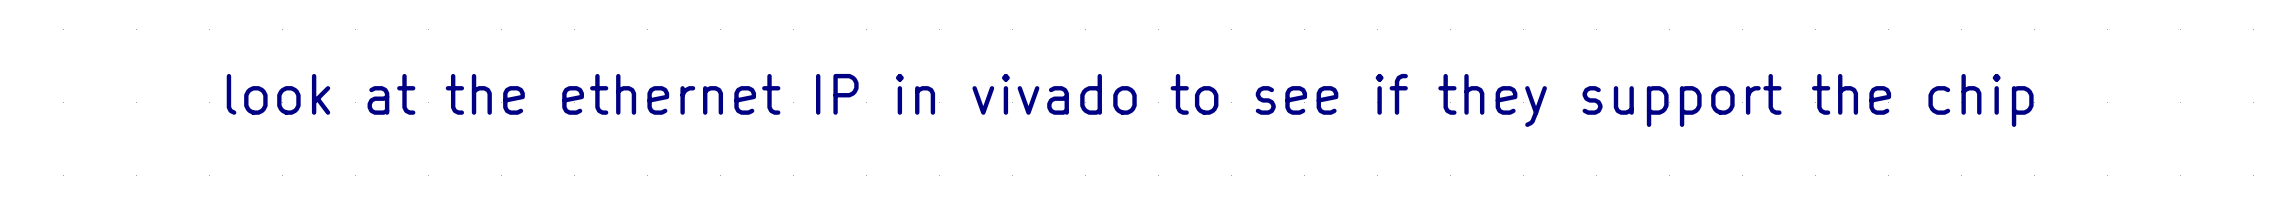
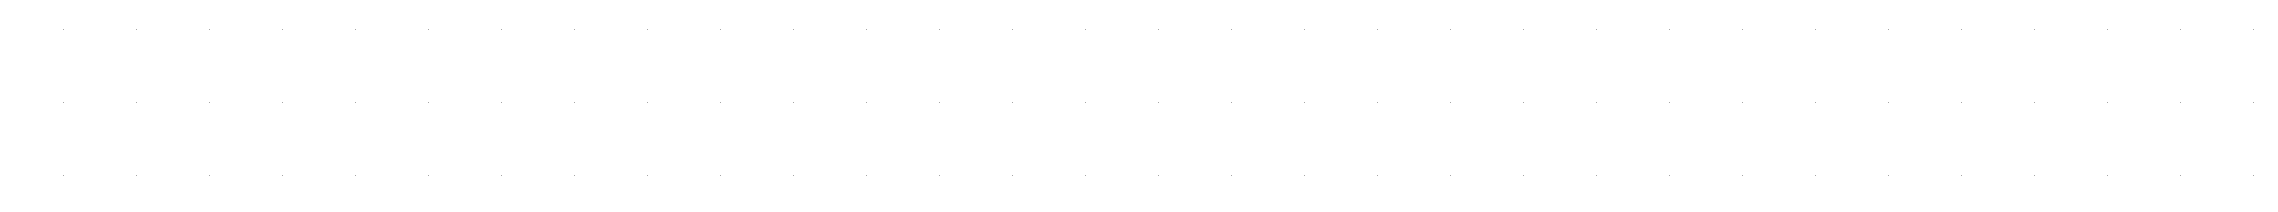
text: look at the ethernet IP in vivado to see if they support the chip (1130, 100) -> none

